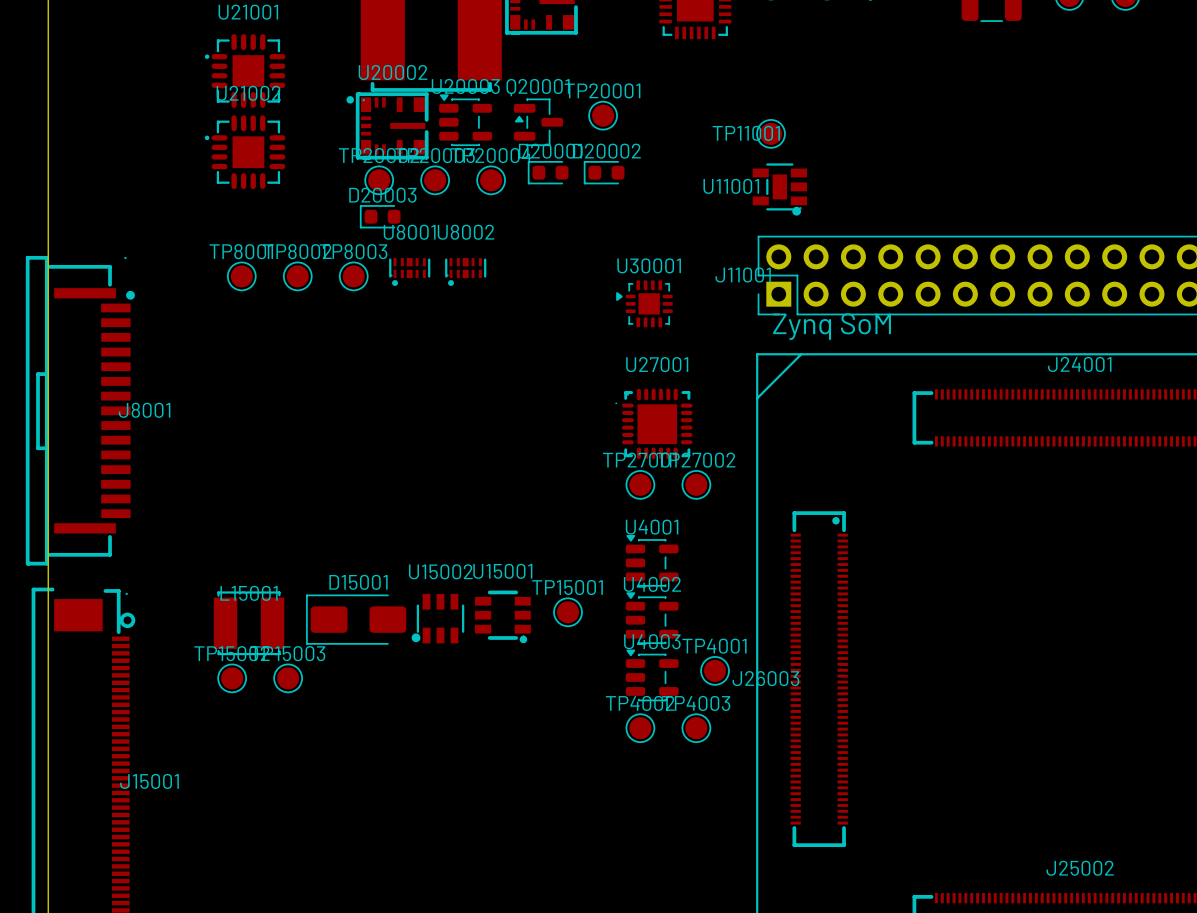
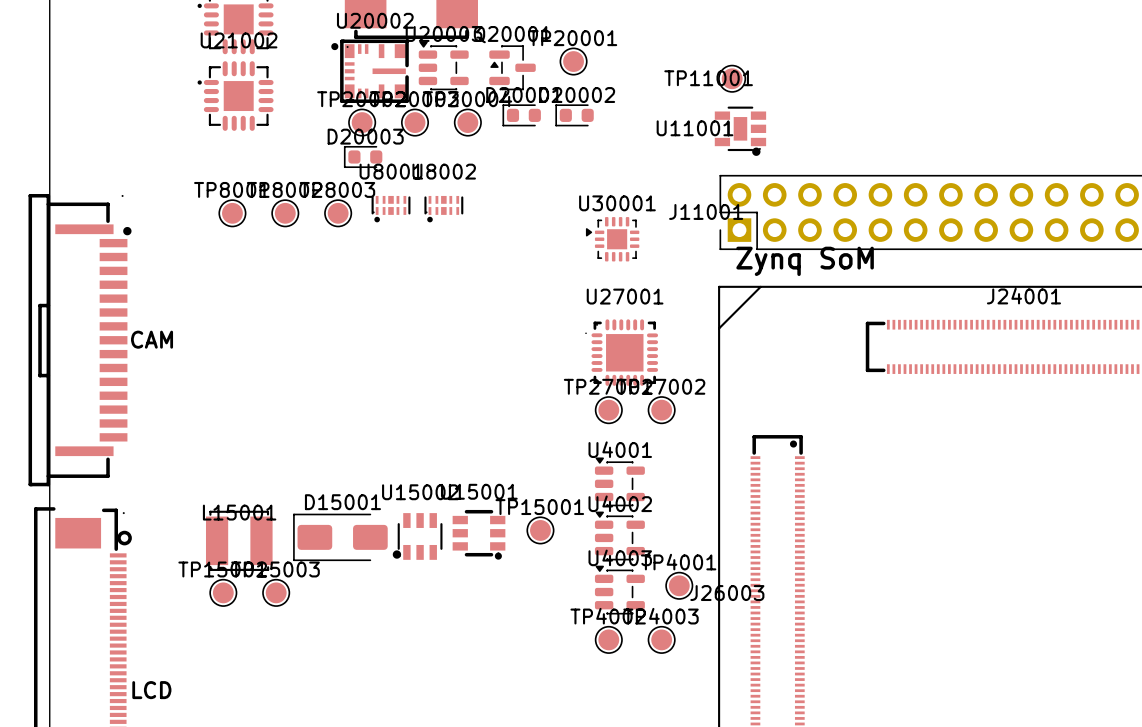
J8001 name: J8001 (144, 410) -> none
text: none -> CAM (152, 339)
J15001 name: J15001 (149, 781) -> none
text: none -> LCD (151, 690)

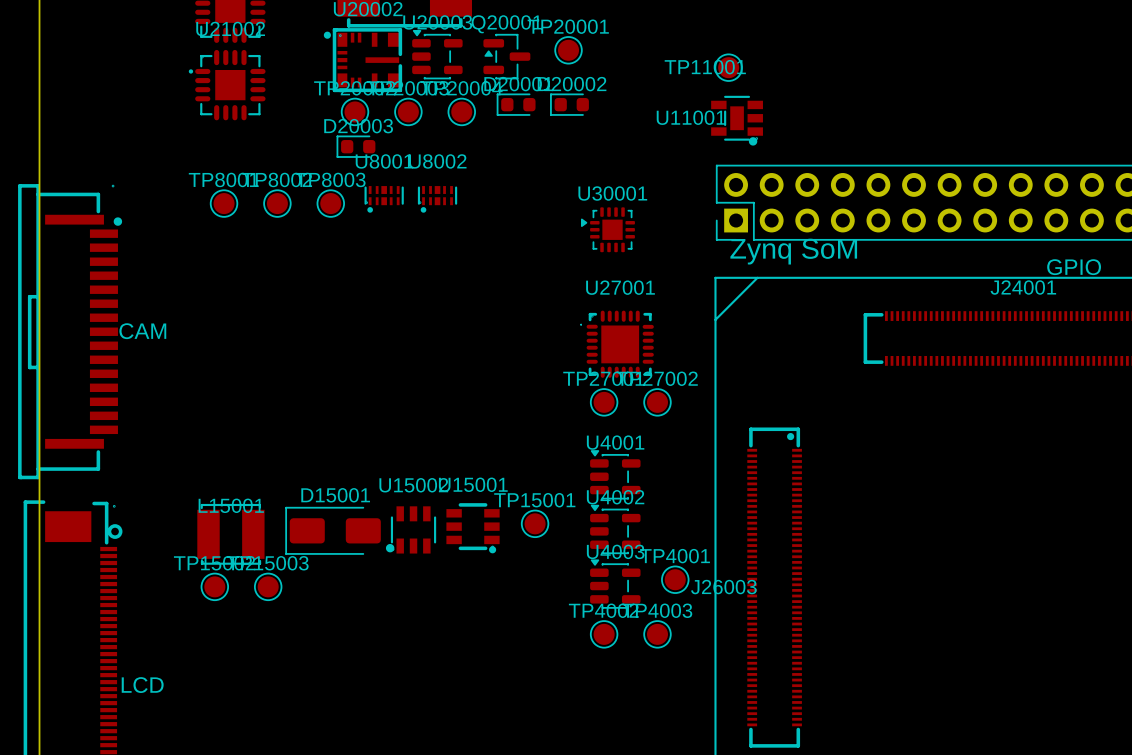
J11001 name: J11001 (706, 211) -> none
text: none -> GPIO (1074, 267)

